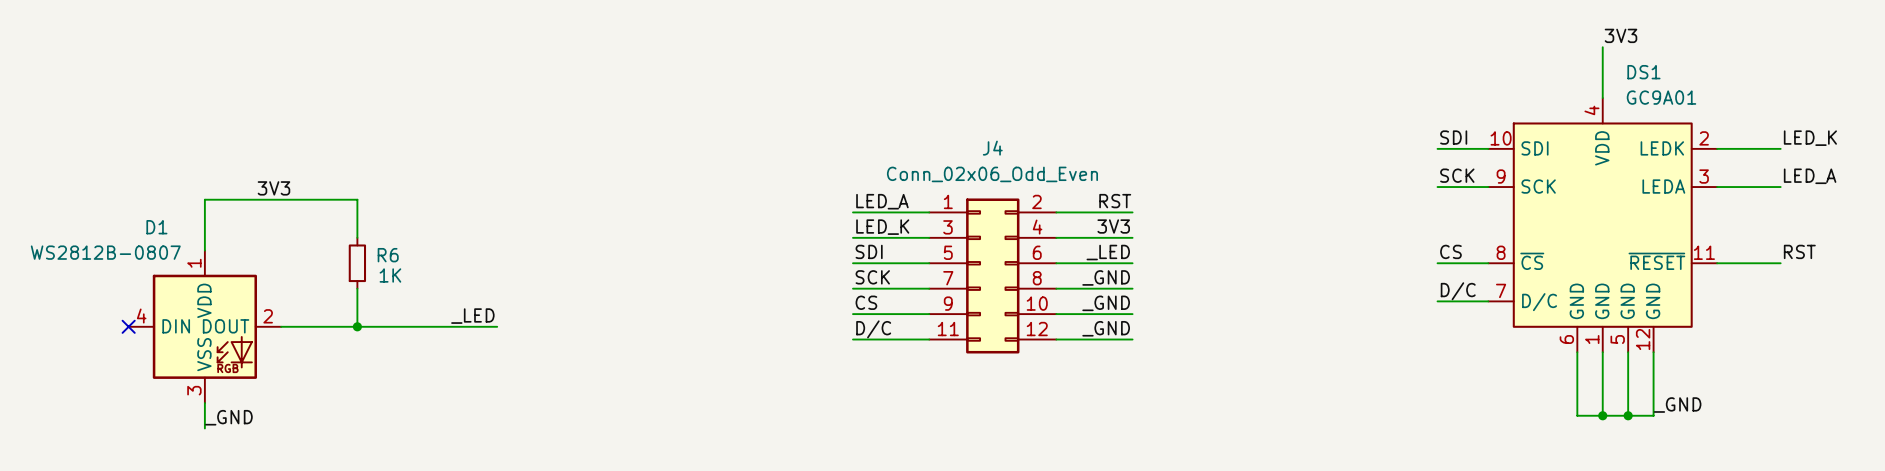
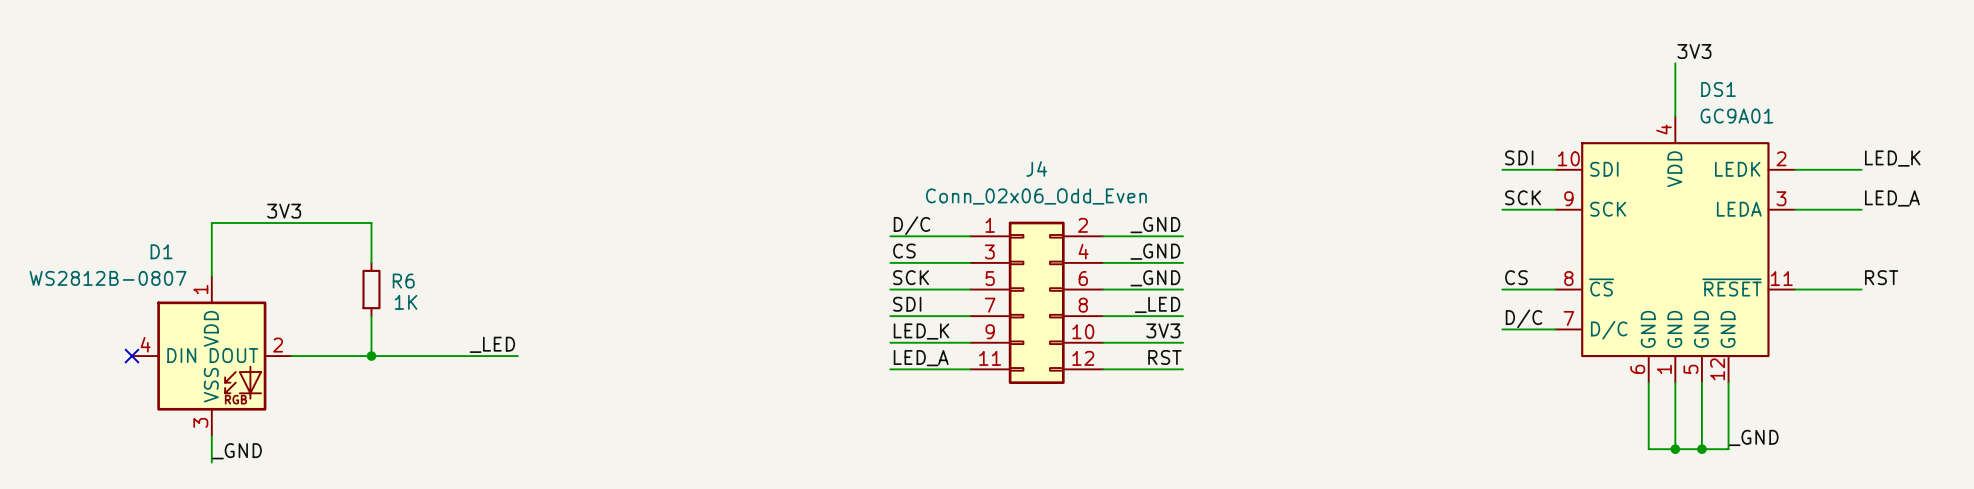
label: LED_A (882, 201) -> D/C (912, 225)
label: RST (1115, 201) -> _GND (1155, 225)
label: 3V3 (1113, 226) -> _GND (1155, 251)
label: LED_K (882, 227) -> CS (904, 251)
label: SDI (869, 251) -> SCK (911, 277)
label: _LED (1108, 252) -> _GND (1155, 278)
label: SCK (872, 277) -> SDI (907, 304)
label: _GND (1106, 277) -> _LED (1157, 304)
label: CS (866, 302) -> LED_K (921, 331)
label: _GND (1106, 303) -> 3V3 (1163, 330)
label: _GND (1106, 328) -> RST (1164, 357)
label: D/C (873, 329) -> LED_A (921, 358)

